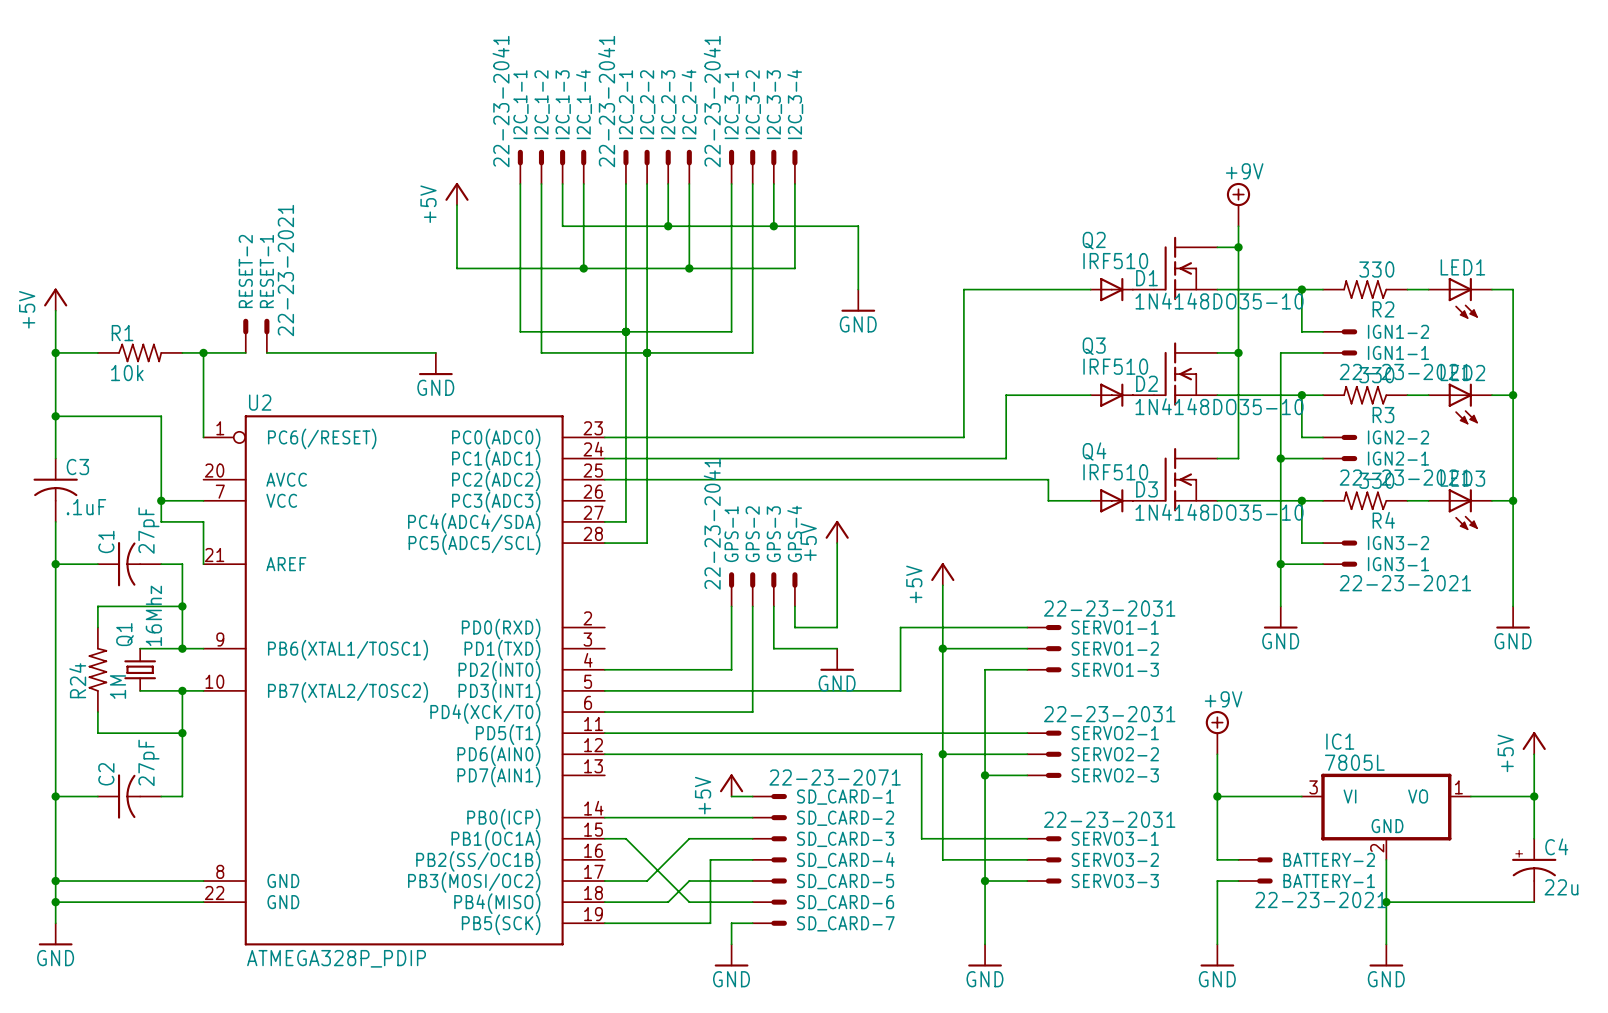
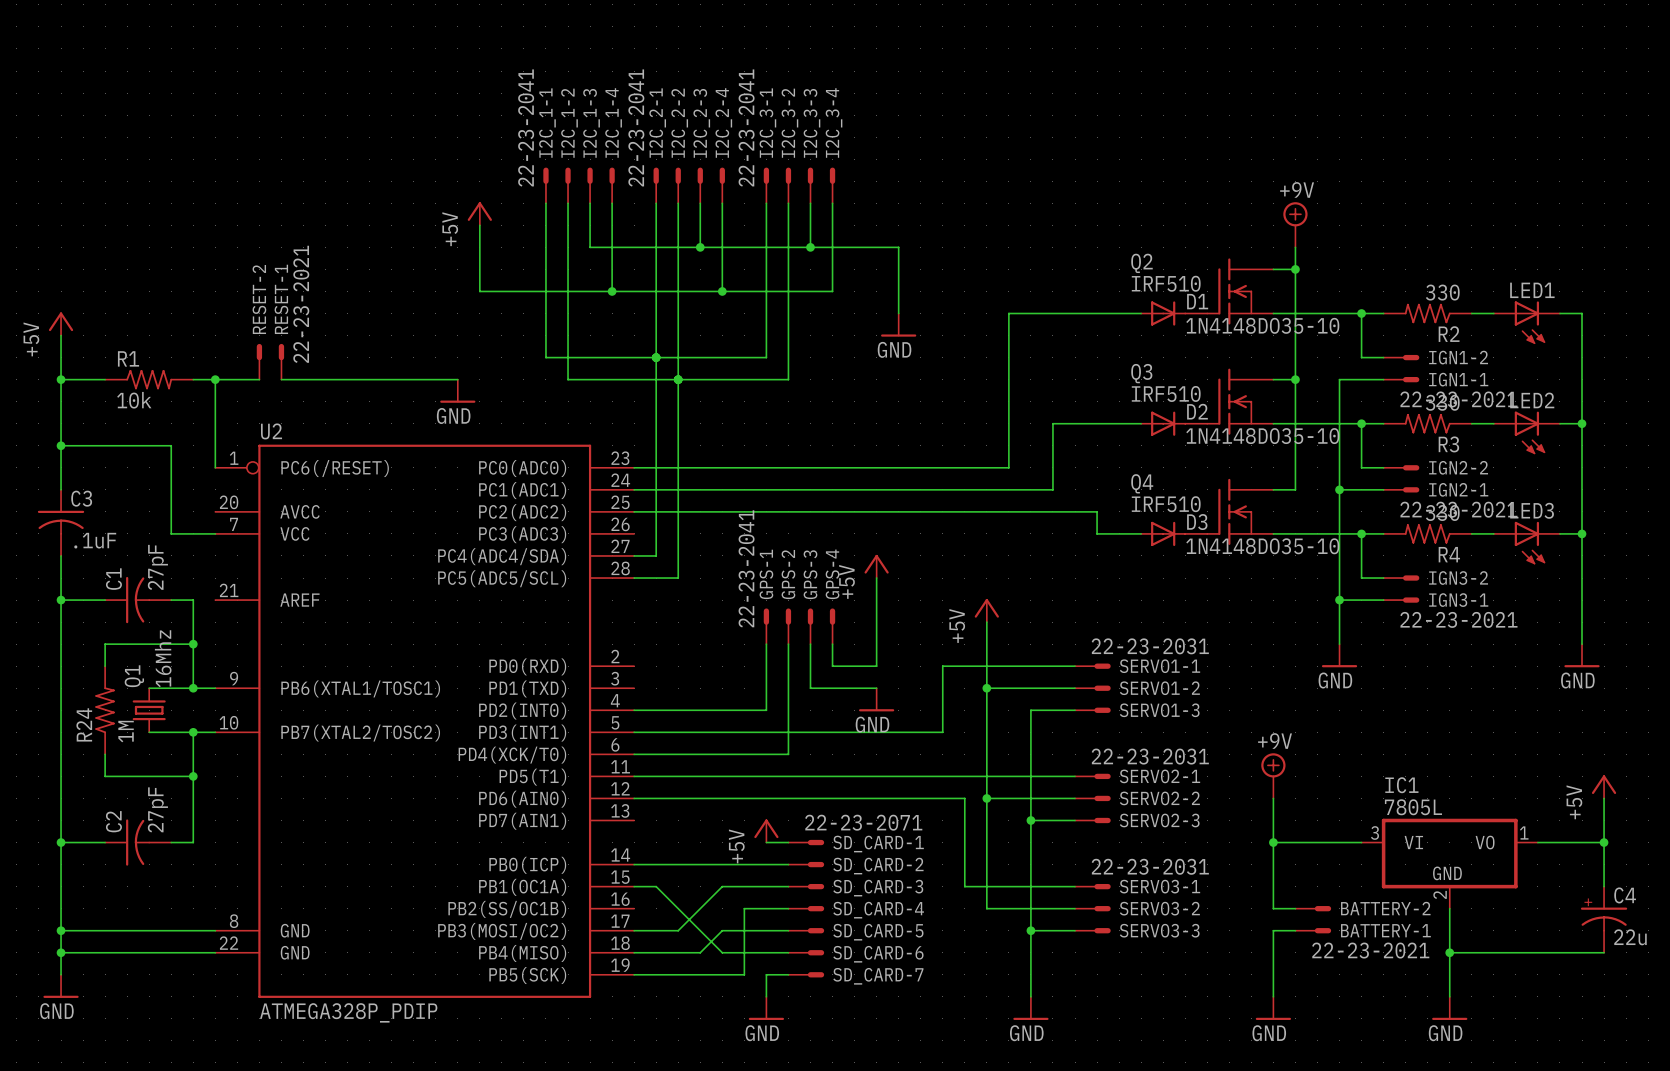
wire: (161, 500) (161, 521) (203, 521) (203, 564) -> none
junction: (161, 500) -> none

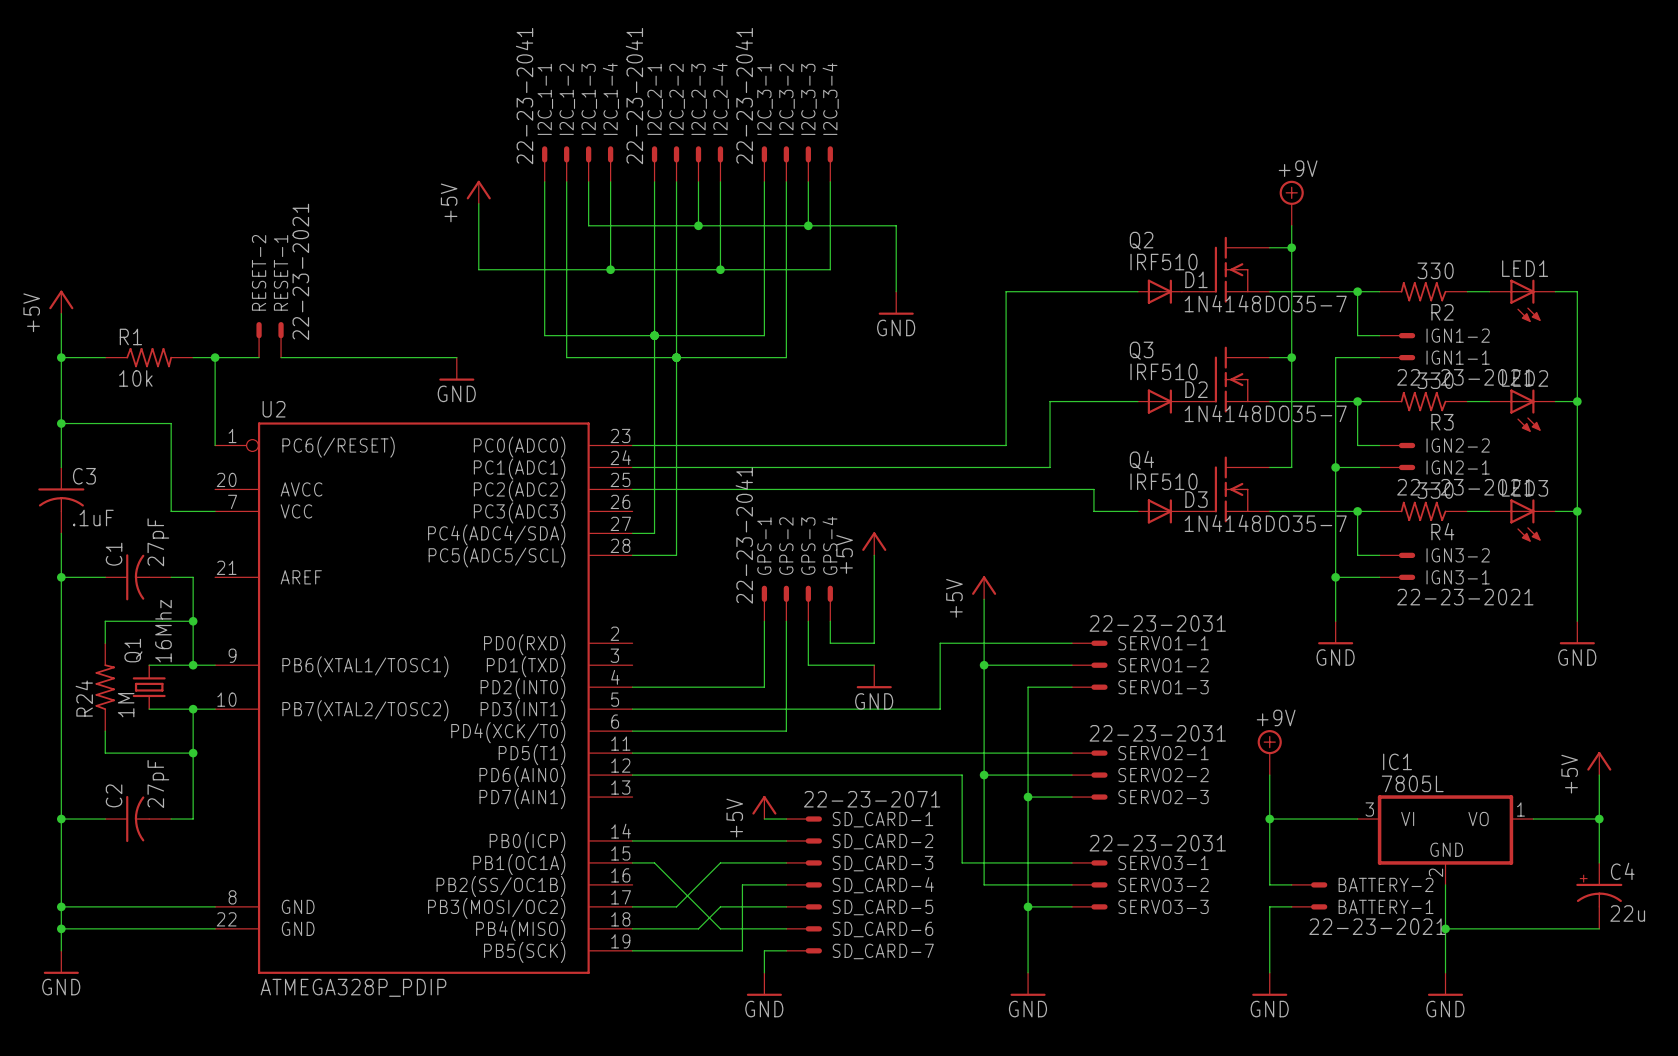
D1 value: 1N4148DO35-10 (1262, 325) -> 1N4148DO35-7 (1265, 303)
D2 value: 1N4148DO35-10 (1262, 436) -> 1N4148DO35-7 (1265, 413)
D3 value: 1N4148DO35-10 (1262, 546) -> 1N4148DO35-7 (1265, 523)

